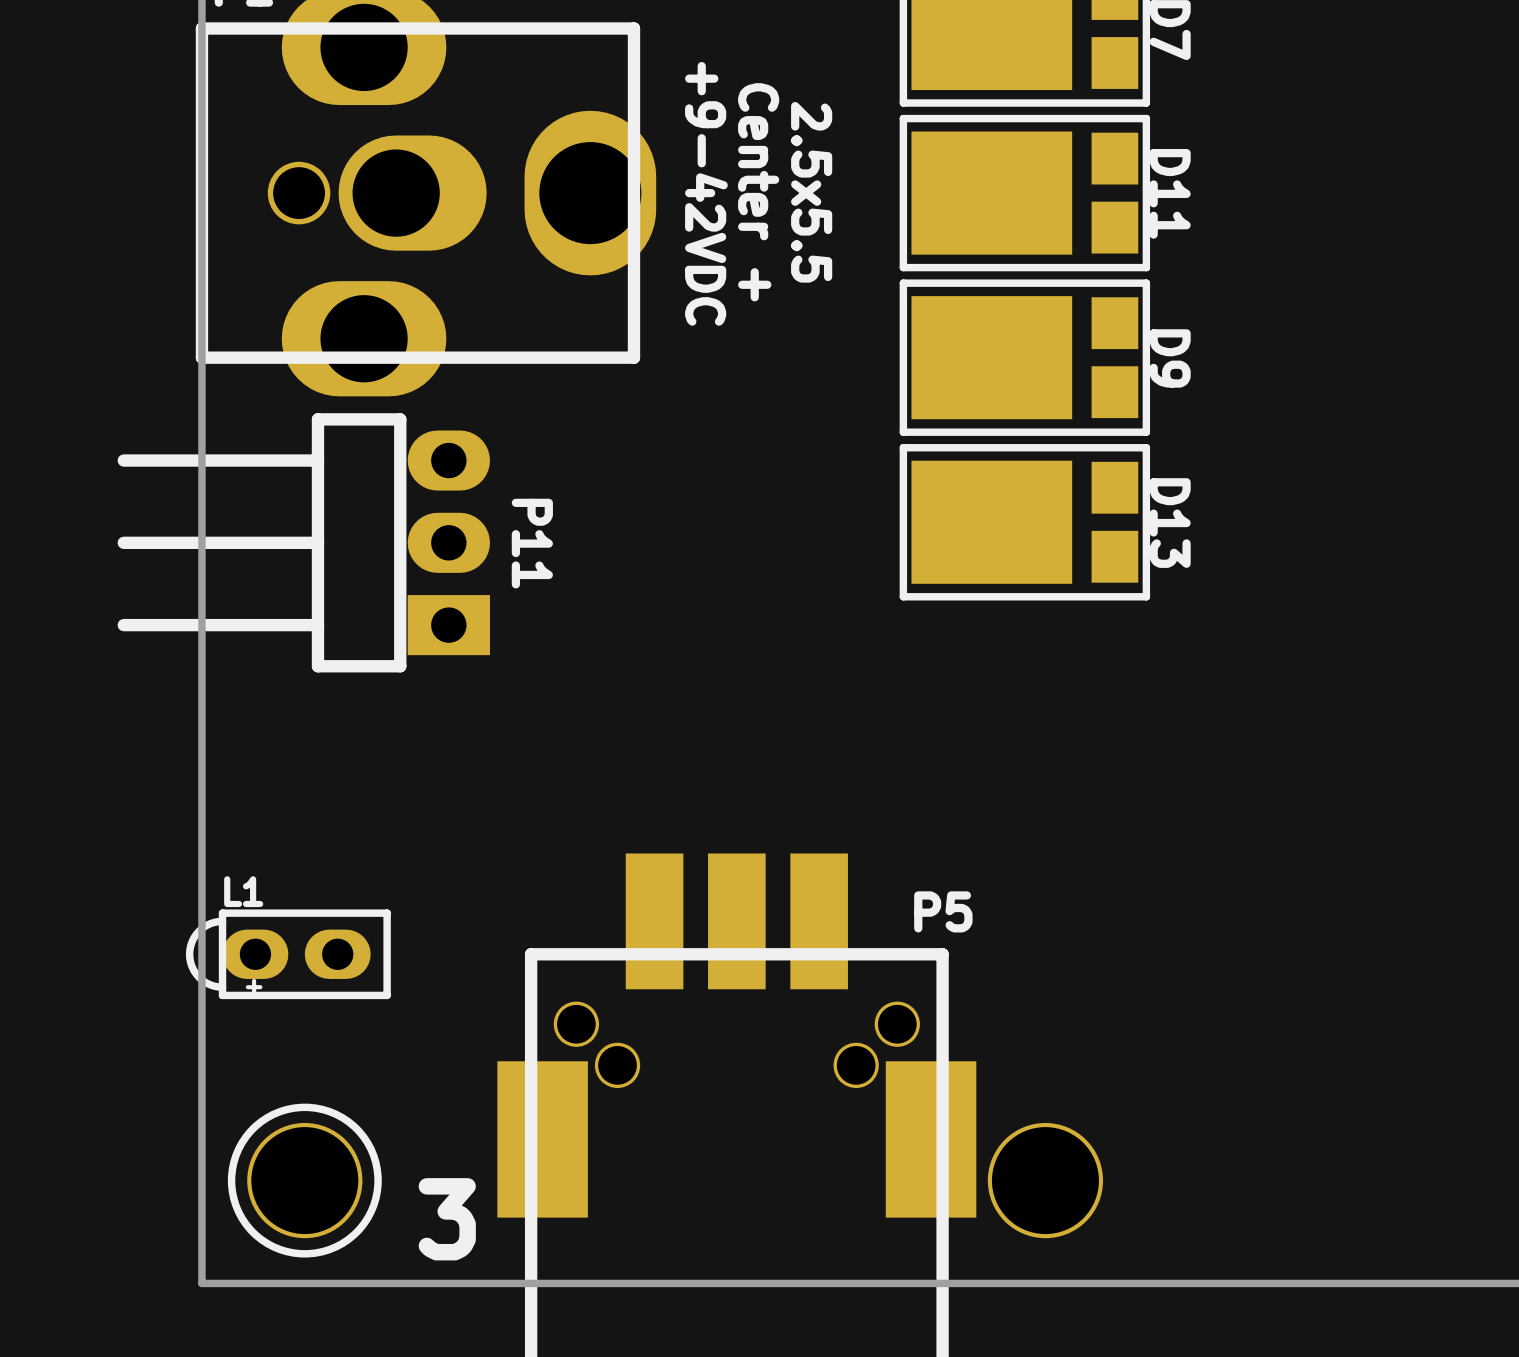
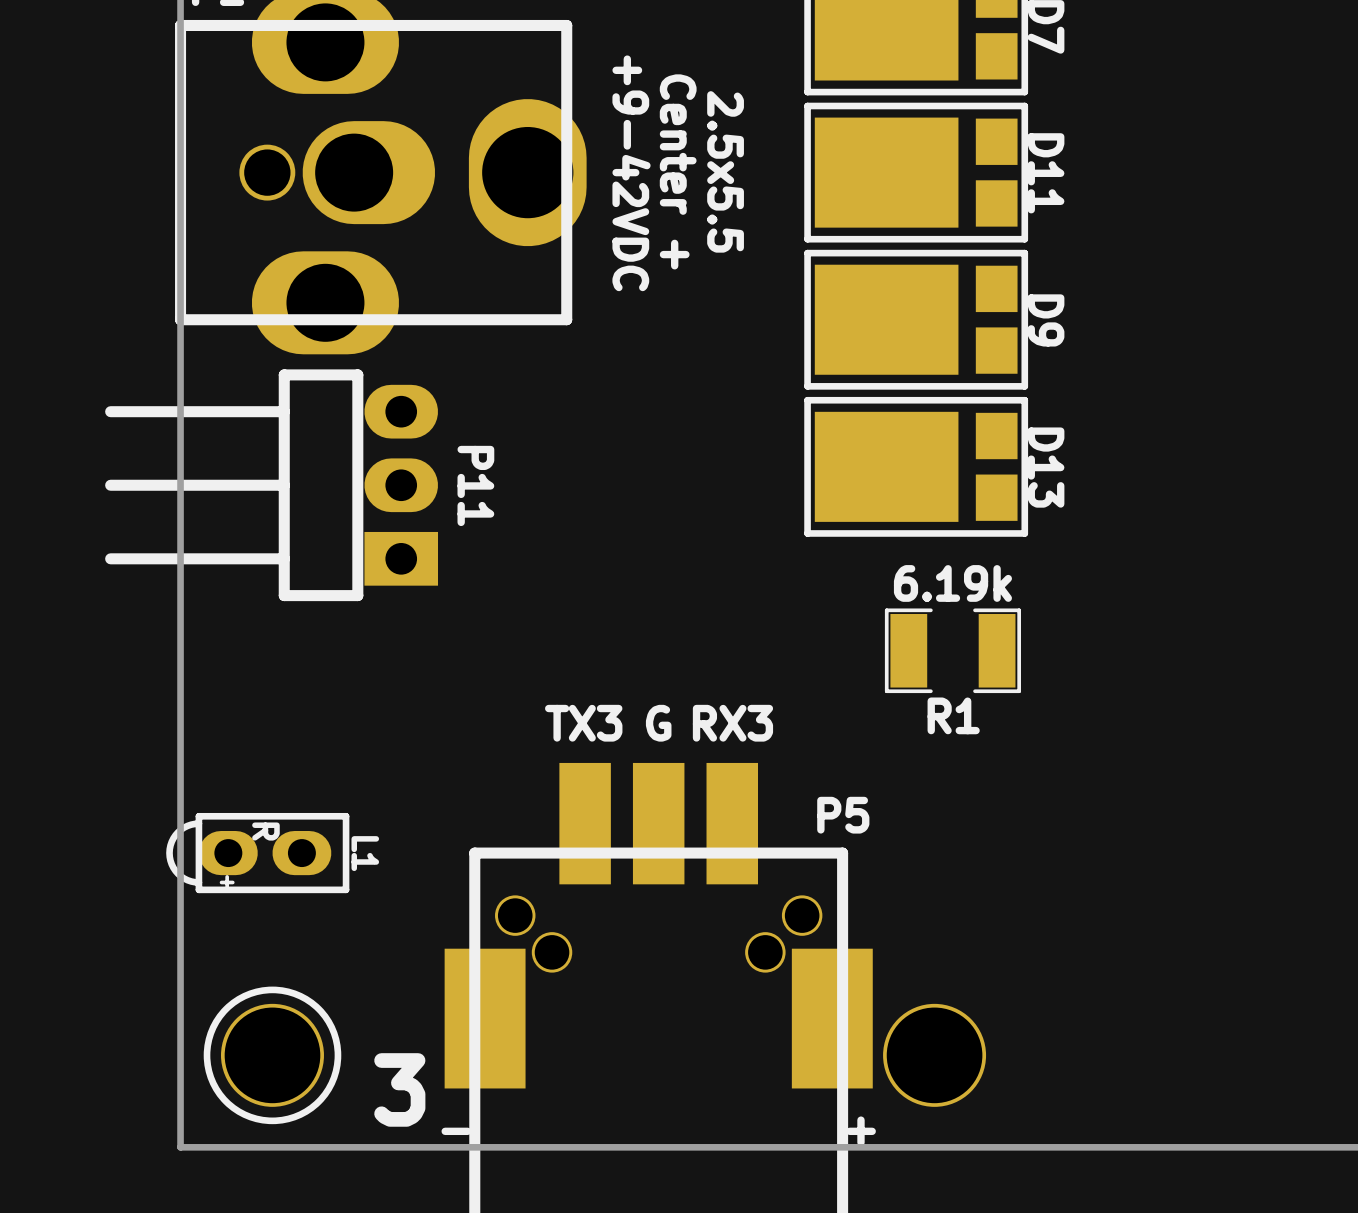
R1: none -> 6.19k (952, 650)
text: none -> TX3 (583, 723)
text: none -> G (658, 723)
text: none -> RX3 (732, 723)
L1 name rotation: 0° (243, 891) -> 90° clockwise (365, 853)
L1 name position: L1 (243, 891) -> L1 (365, 853)
text: none -> R (265, 831)
text: none -> - (456, 1131)
text: none -> + (860, 1131)

